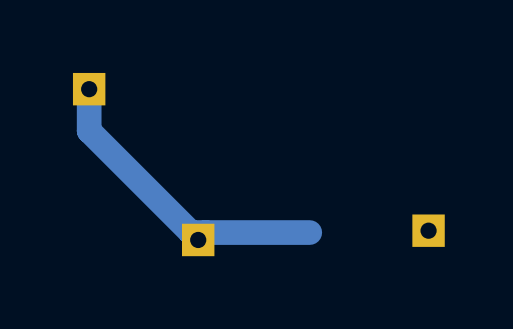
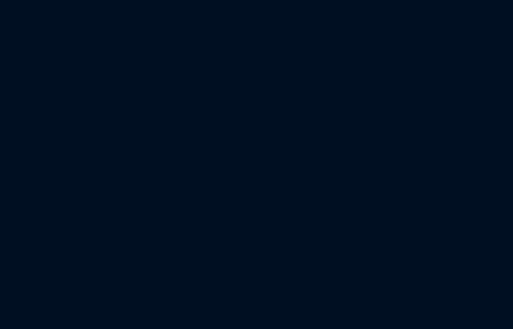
track: (89, 89) (89, 130) (190, 232) (309, 232) -> none
part: (89, 89) -> none
part: (428, 230) -> none
part: (198, 239) -> none

